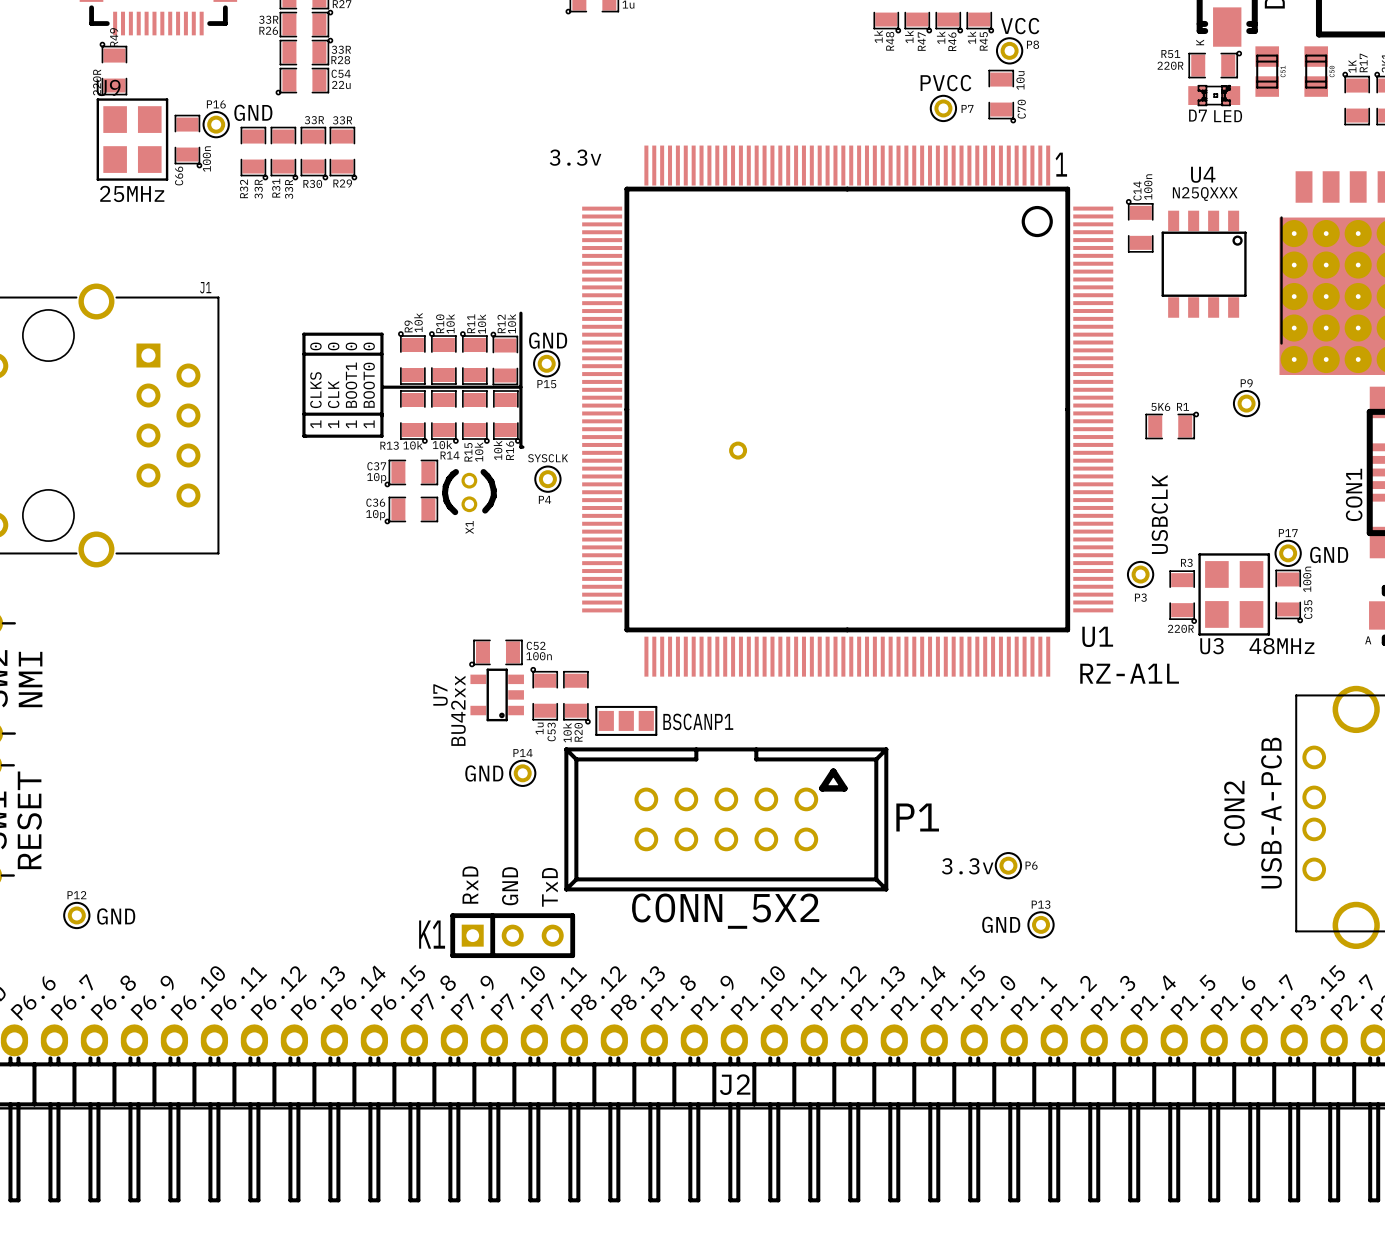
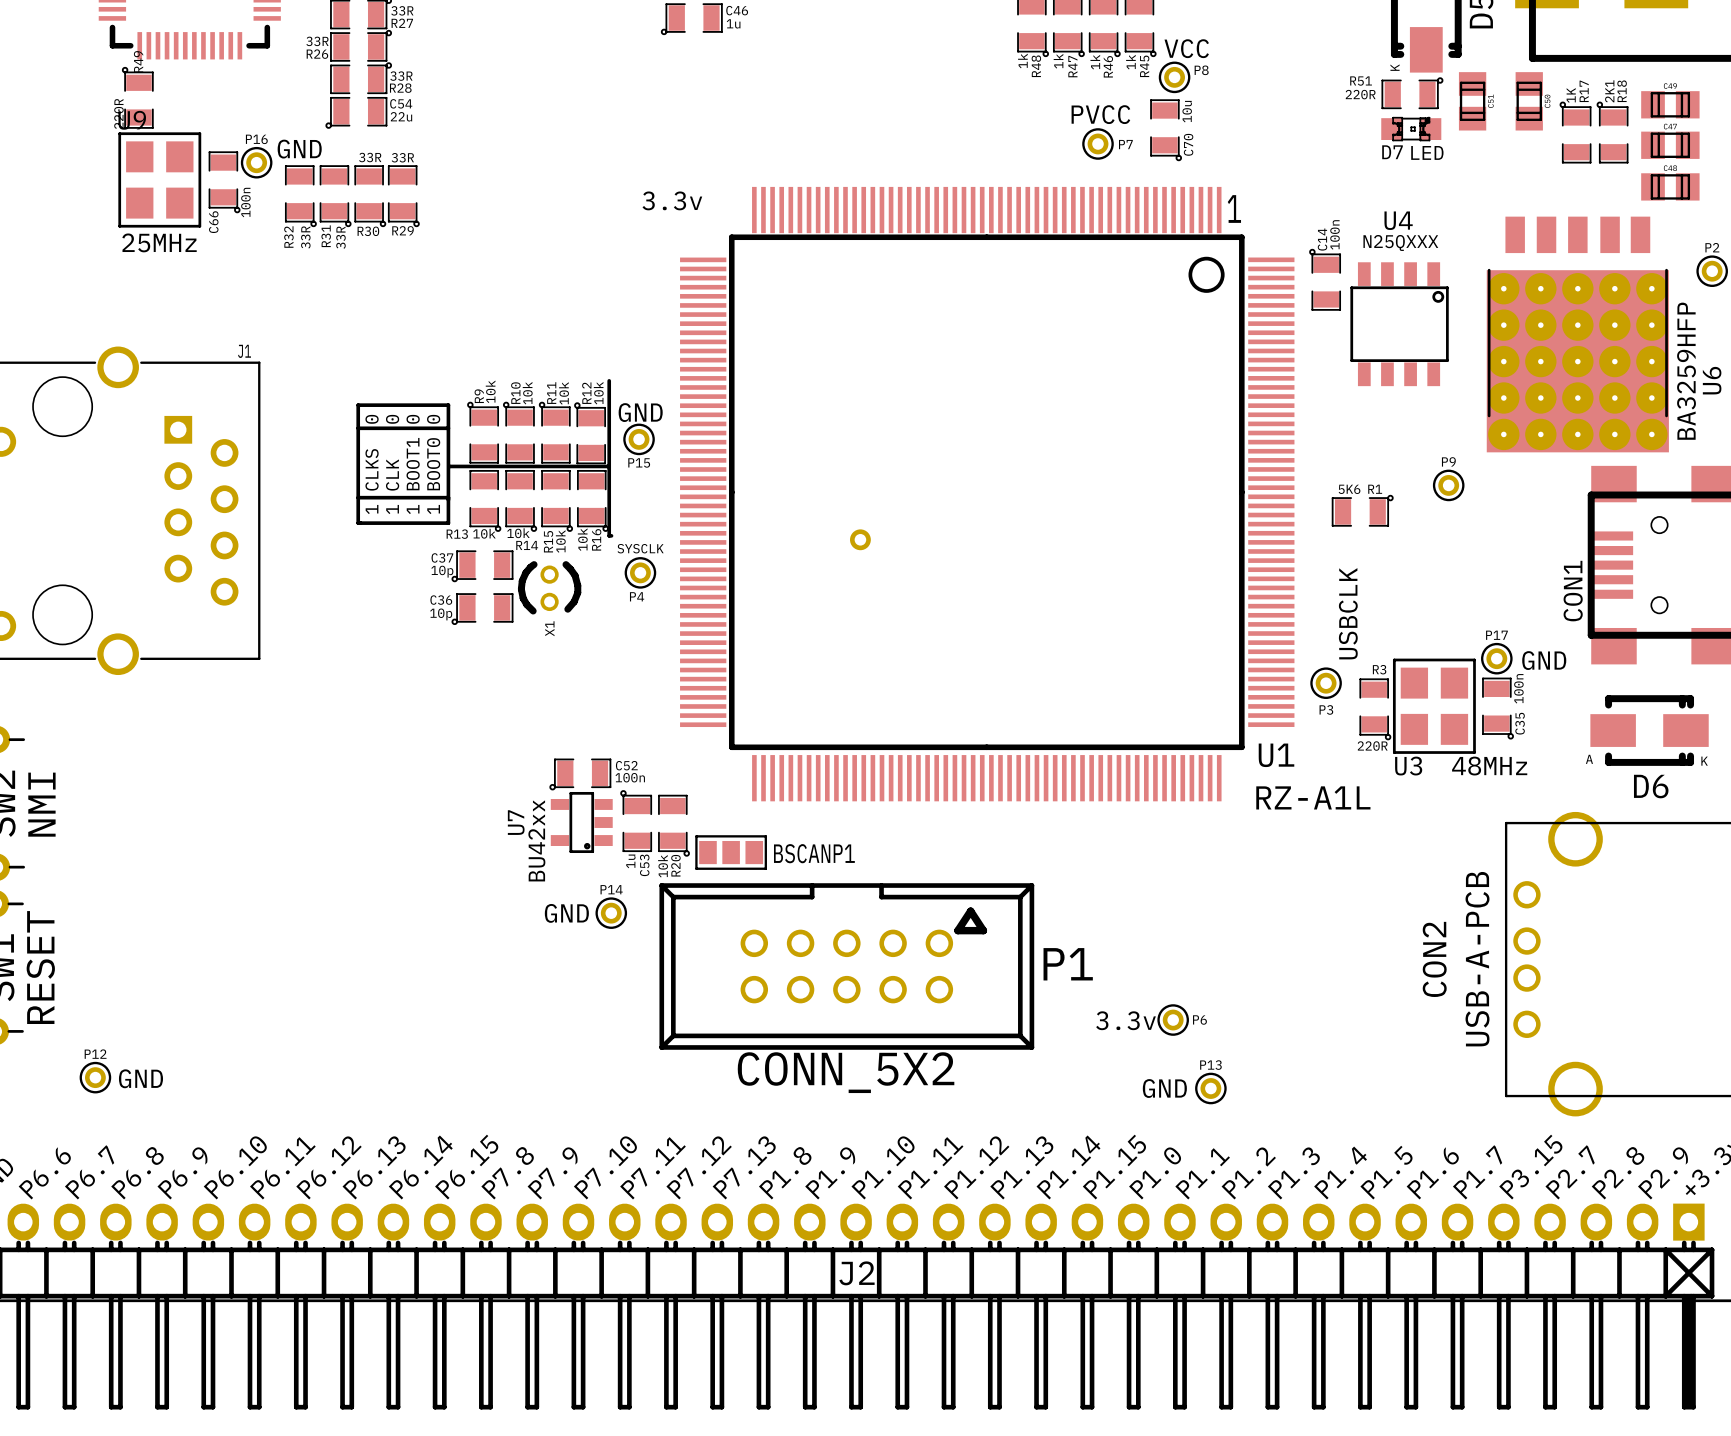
text: RxD (470, 885) -> none
text: GND (510, 886) -> none
text: TxD (549, 887) -> none
K1: (512, 935) -> none
text: P8.12 (598, 993) -> P7.12 (699, 1167)
text: P8.13 (637, 993) -> P7.13 (744, 1167)

